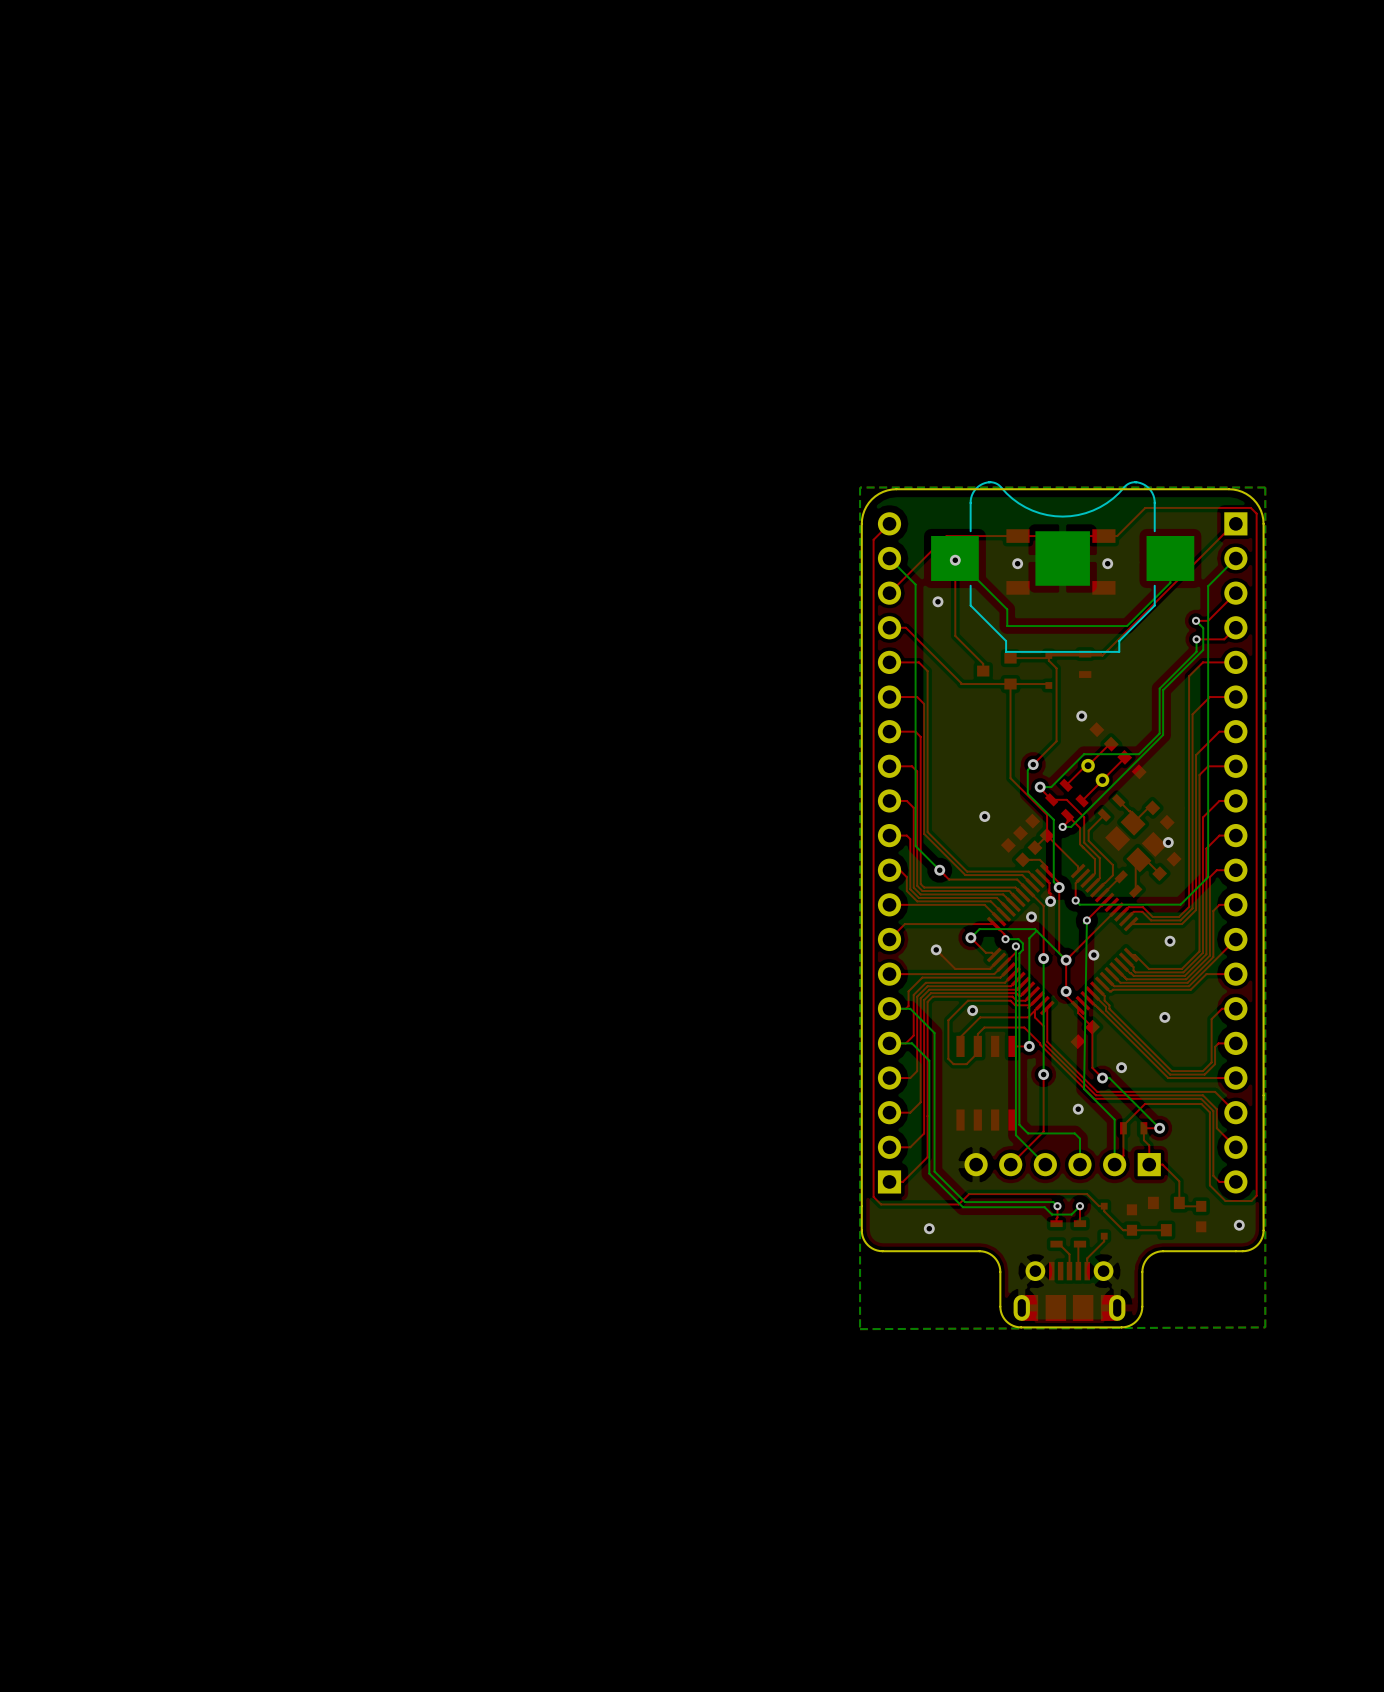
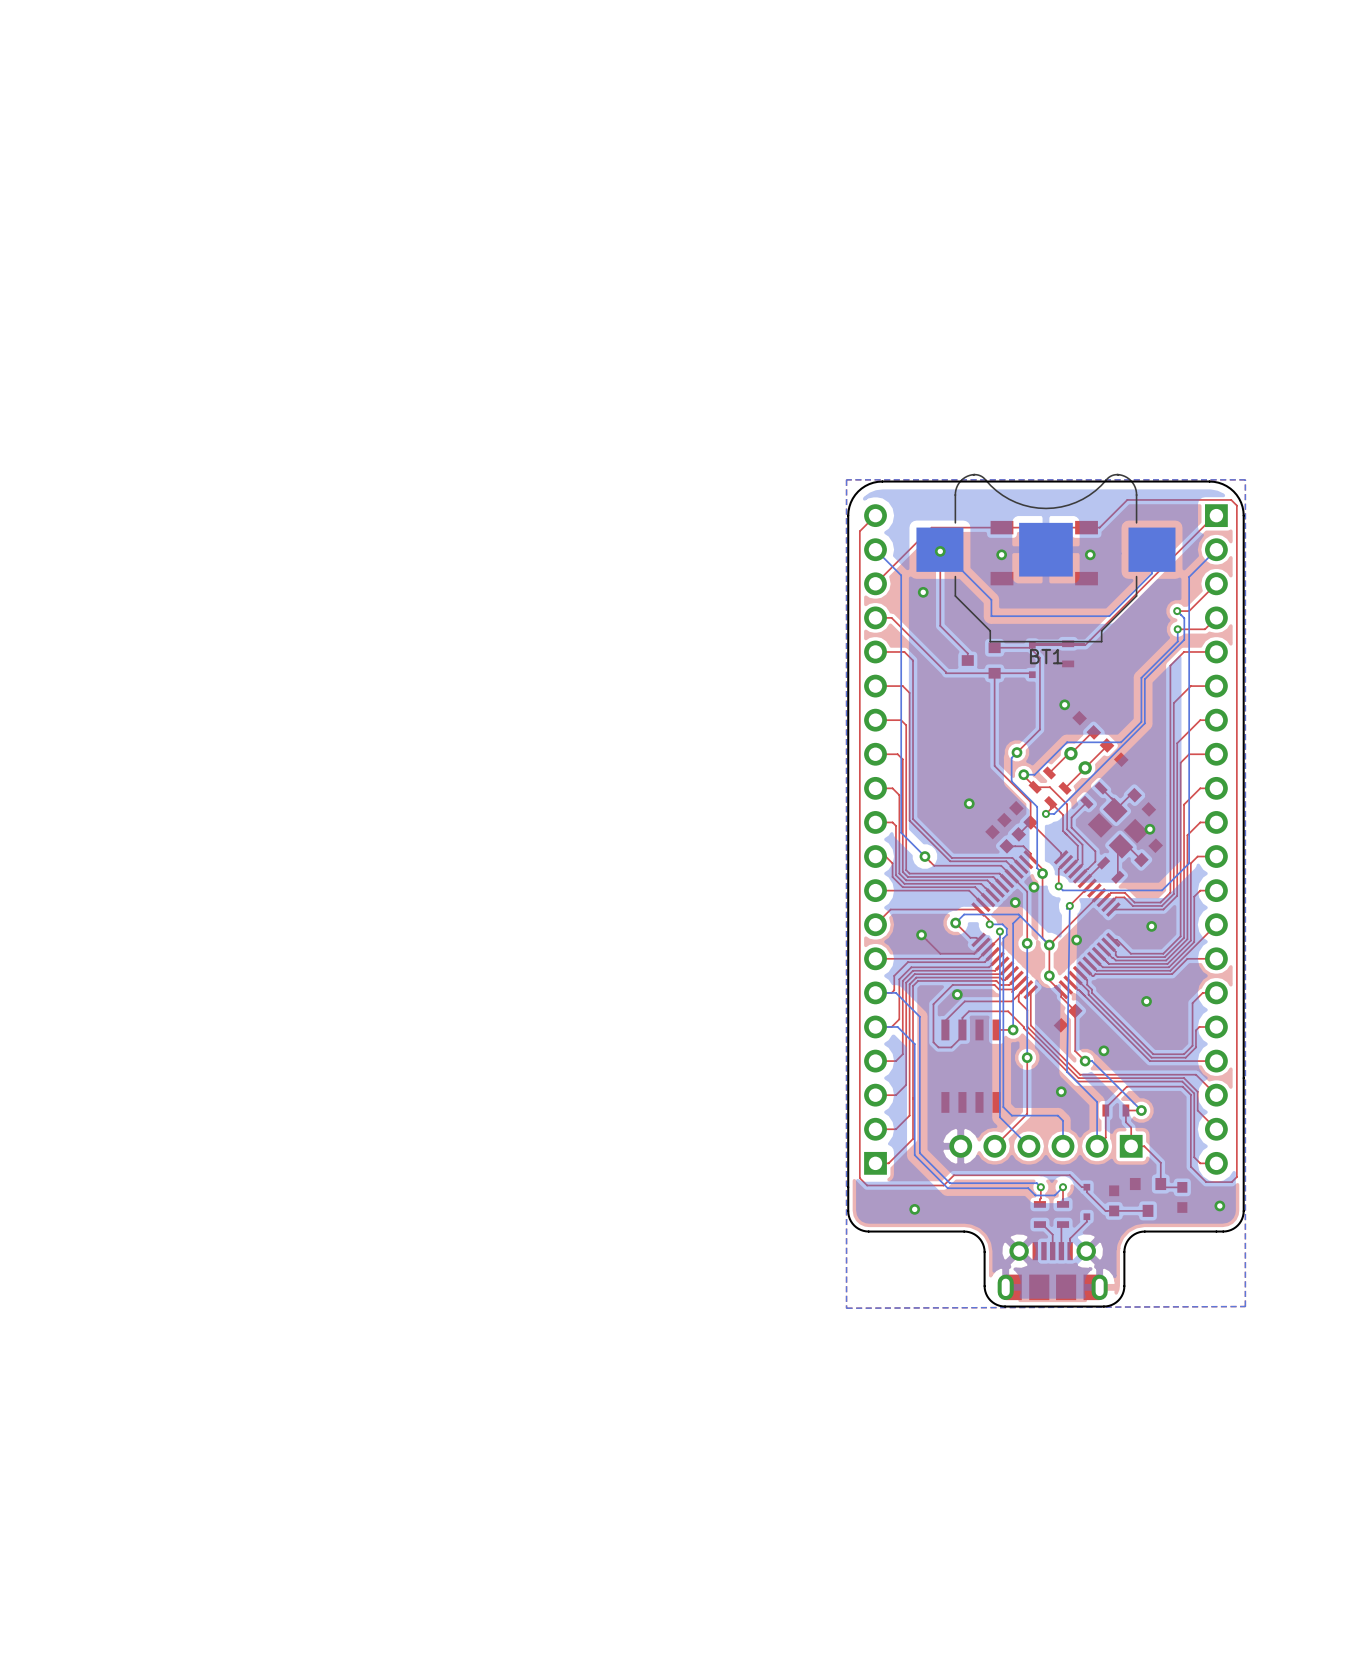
BT1 name: none -> BT1 (1046, 656)
top track: (1042, 875) (1049, 883) (1050, 901) -> none

